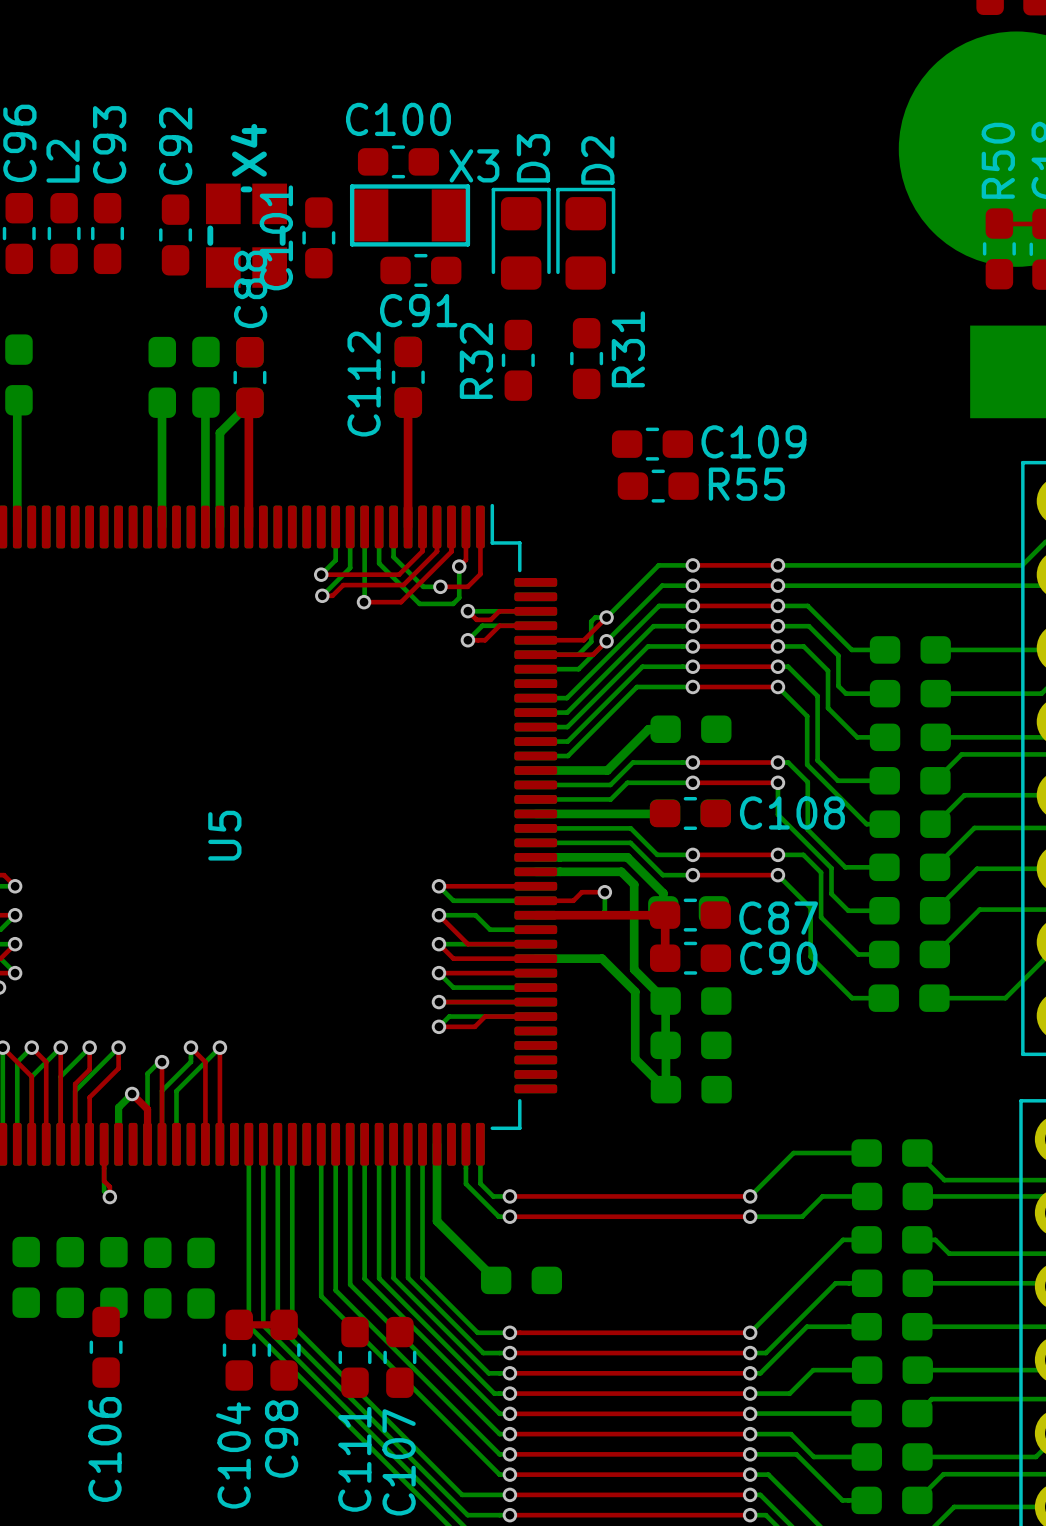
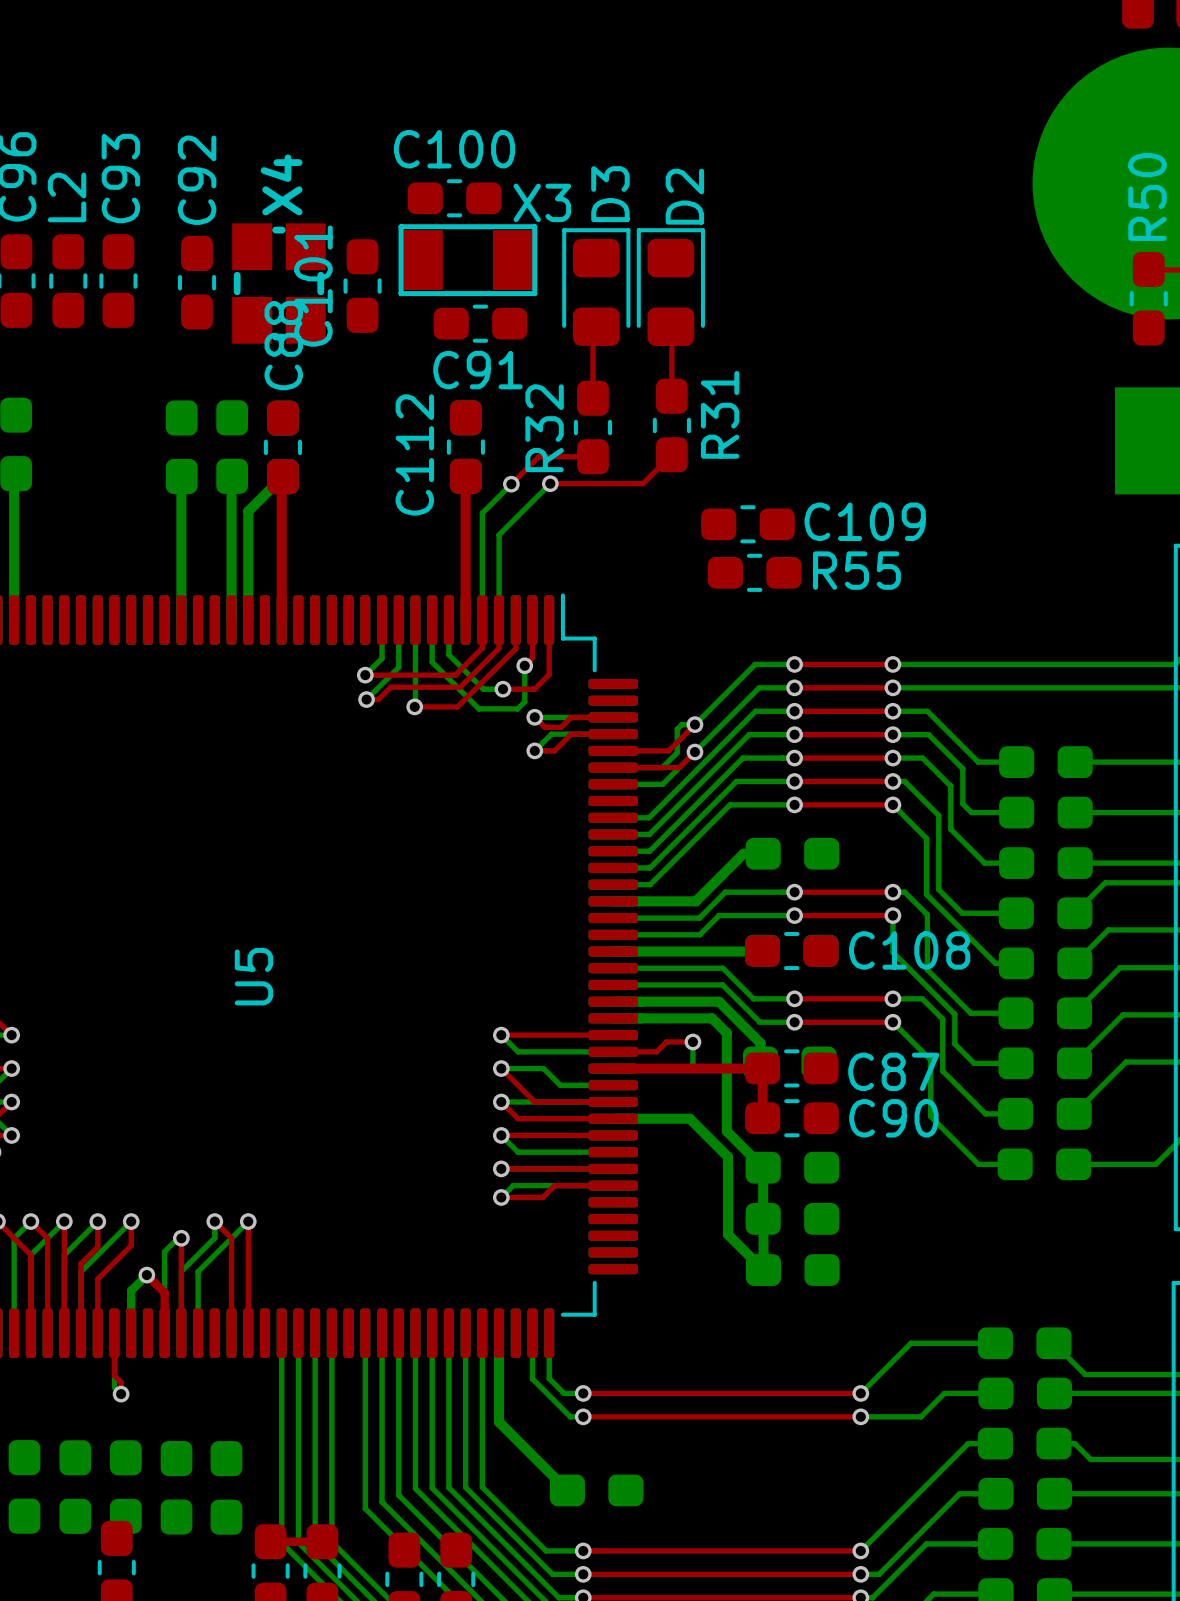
top track: none -> (596, 326) (592, 330) (592, 398)
top track: none -> (670, 326) (671, 396)
top track: none -> (671, 454) (642, 483) (550, 483)
top track: none -> (592, 456) (538, 456) (511, 484)
bottom track: none -> (550, 483) (499, 534) (499, 620)
via: none -> (550, 483)
bottom track: none -> (511, 484) (482, 513) (482, 620)
via: none -> (511, 484)

